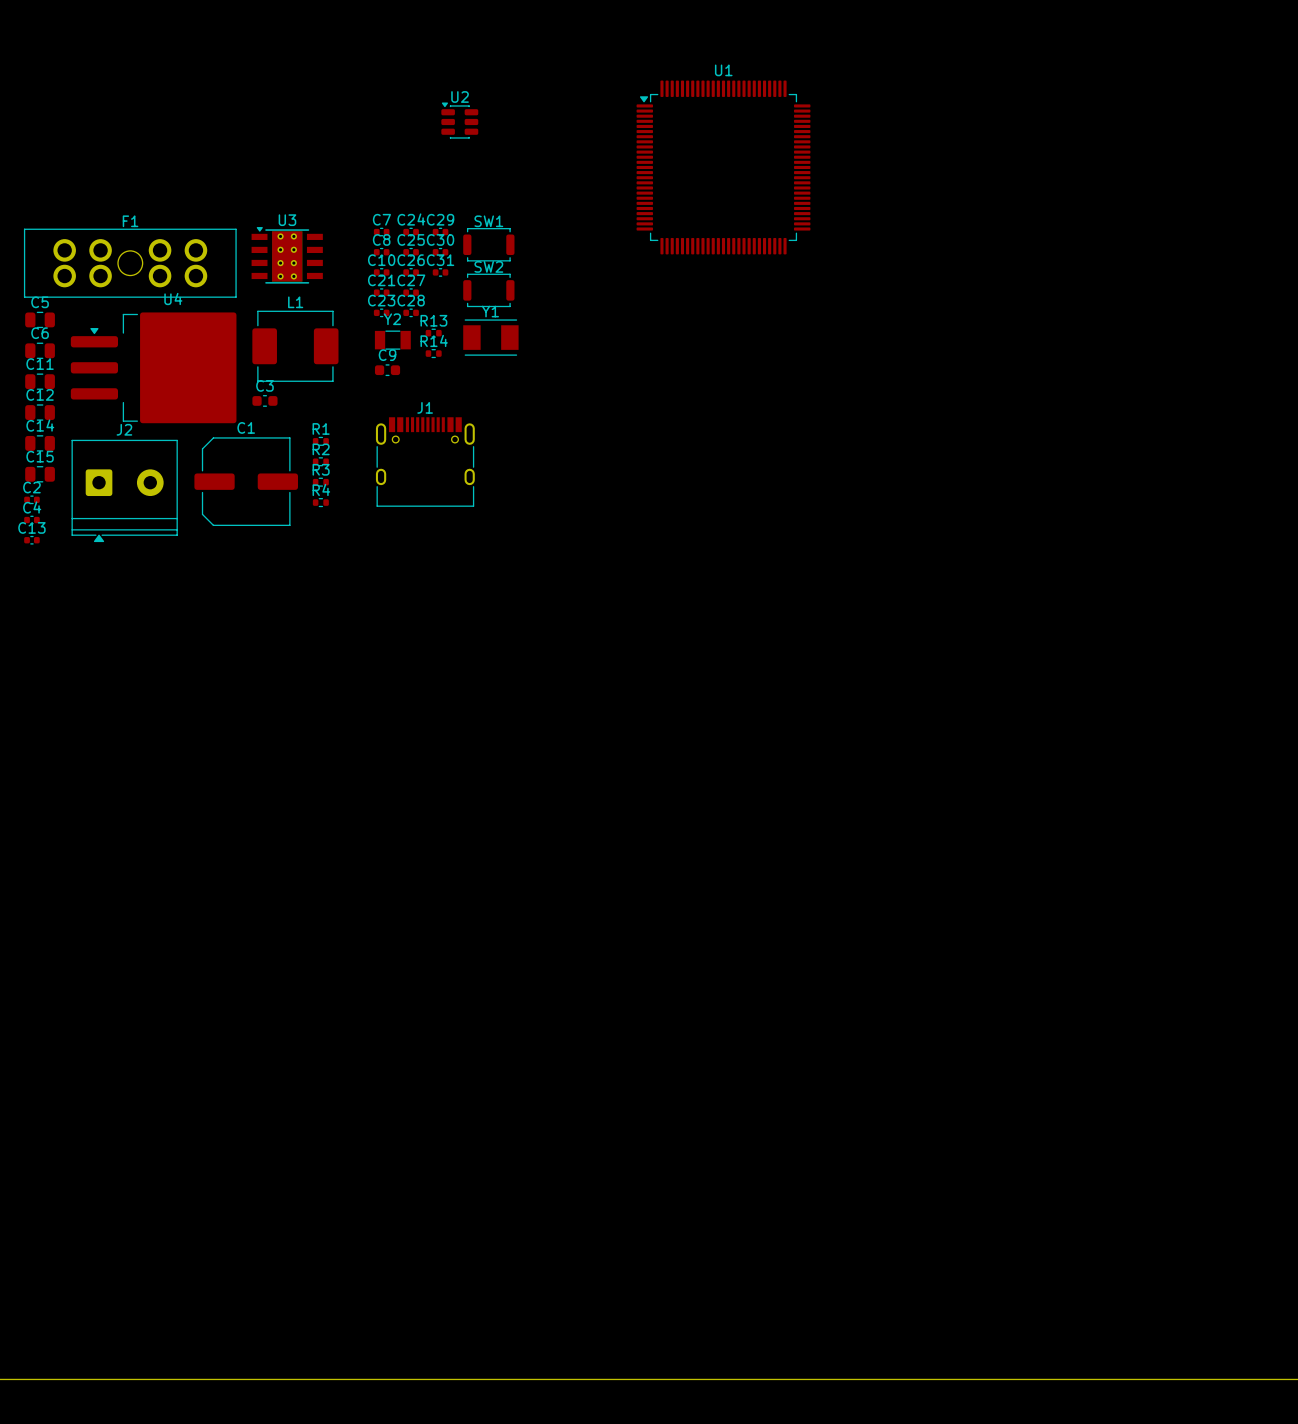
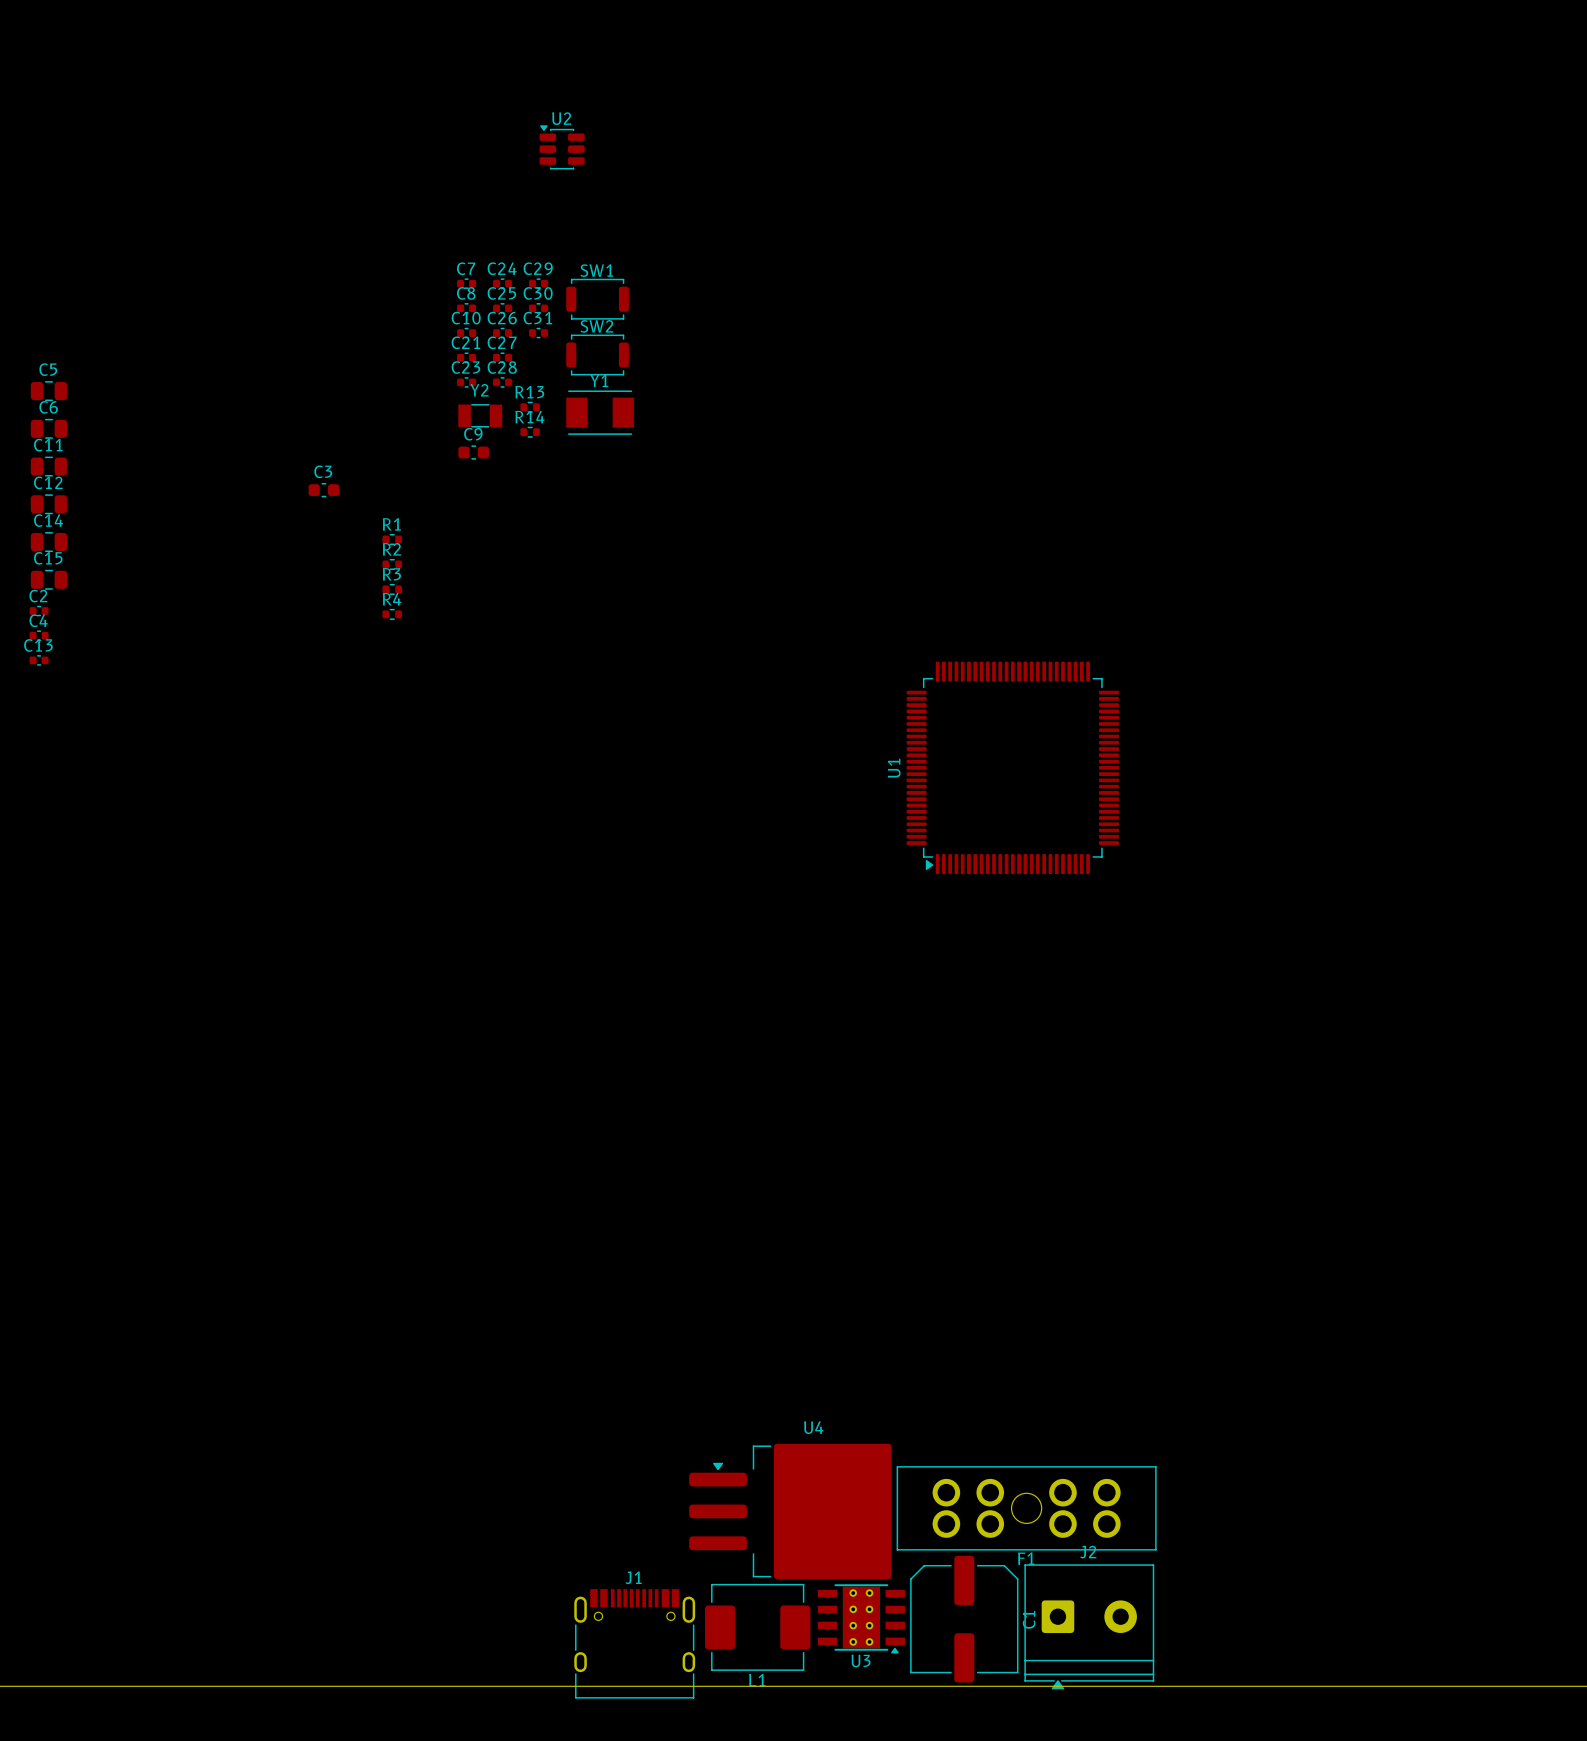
U1 rotation: 0° (723, 167) -> 90° counterclockwise (1012, 767)
U1 position: (723, 167) -> (1012, 767)
F1 name position: F1 (130, 221) -> F1 (1026, 1558)
U3 rotation: 0° (287, 255) -> 180° (861, 1618)
U3 position: (287, 255) -> (861, 1618)
F1 position: (130, 263) -> (1026, 1508)
L1 name position: L1 (295, 302) -> L1 (757, 1680)
L1 position: (295, 346) -> (757, 1627)
U4 position: (153, 367) -> (790, 1511)
J1 position: (425, 462) -> (634, 1643)
C1 rotation: 0° (246, 481) -> 90° clockwise (964, 1619)
C1 position: (246, 481) -> (964, 1619)
J2 position: (124, 490) -> (1089, 1626)

